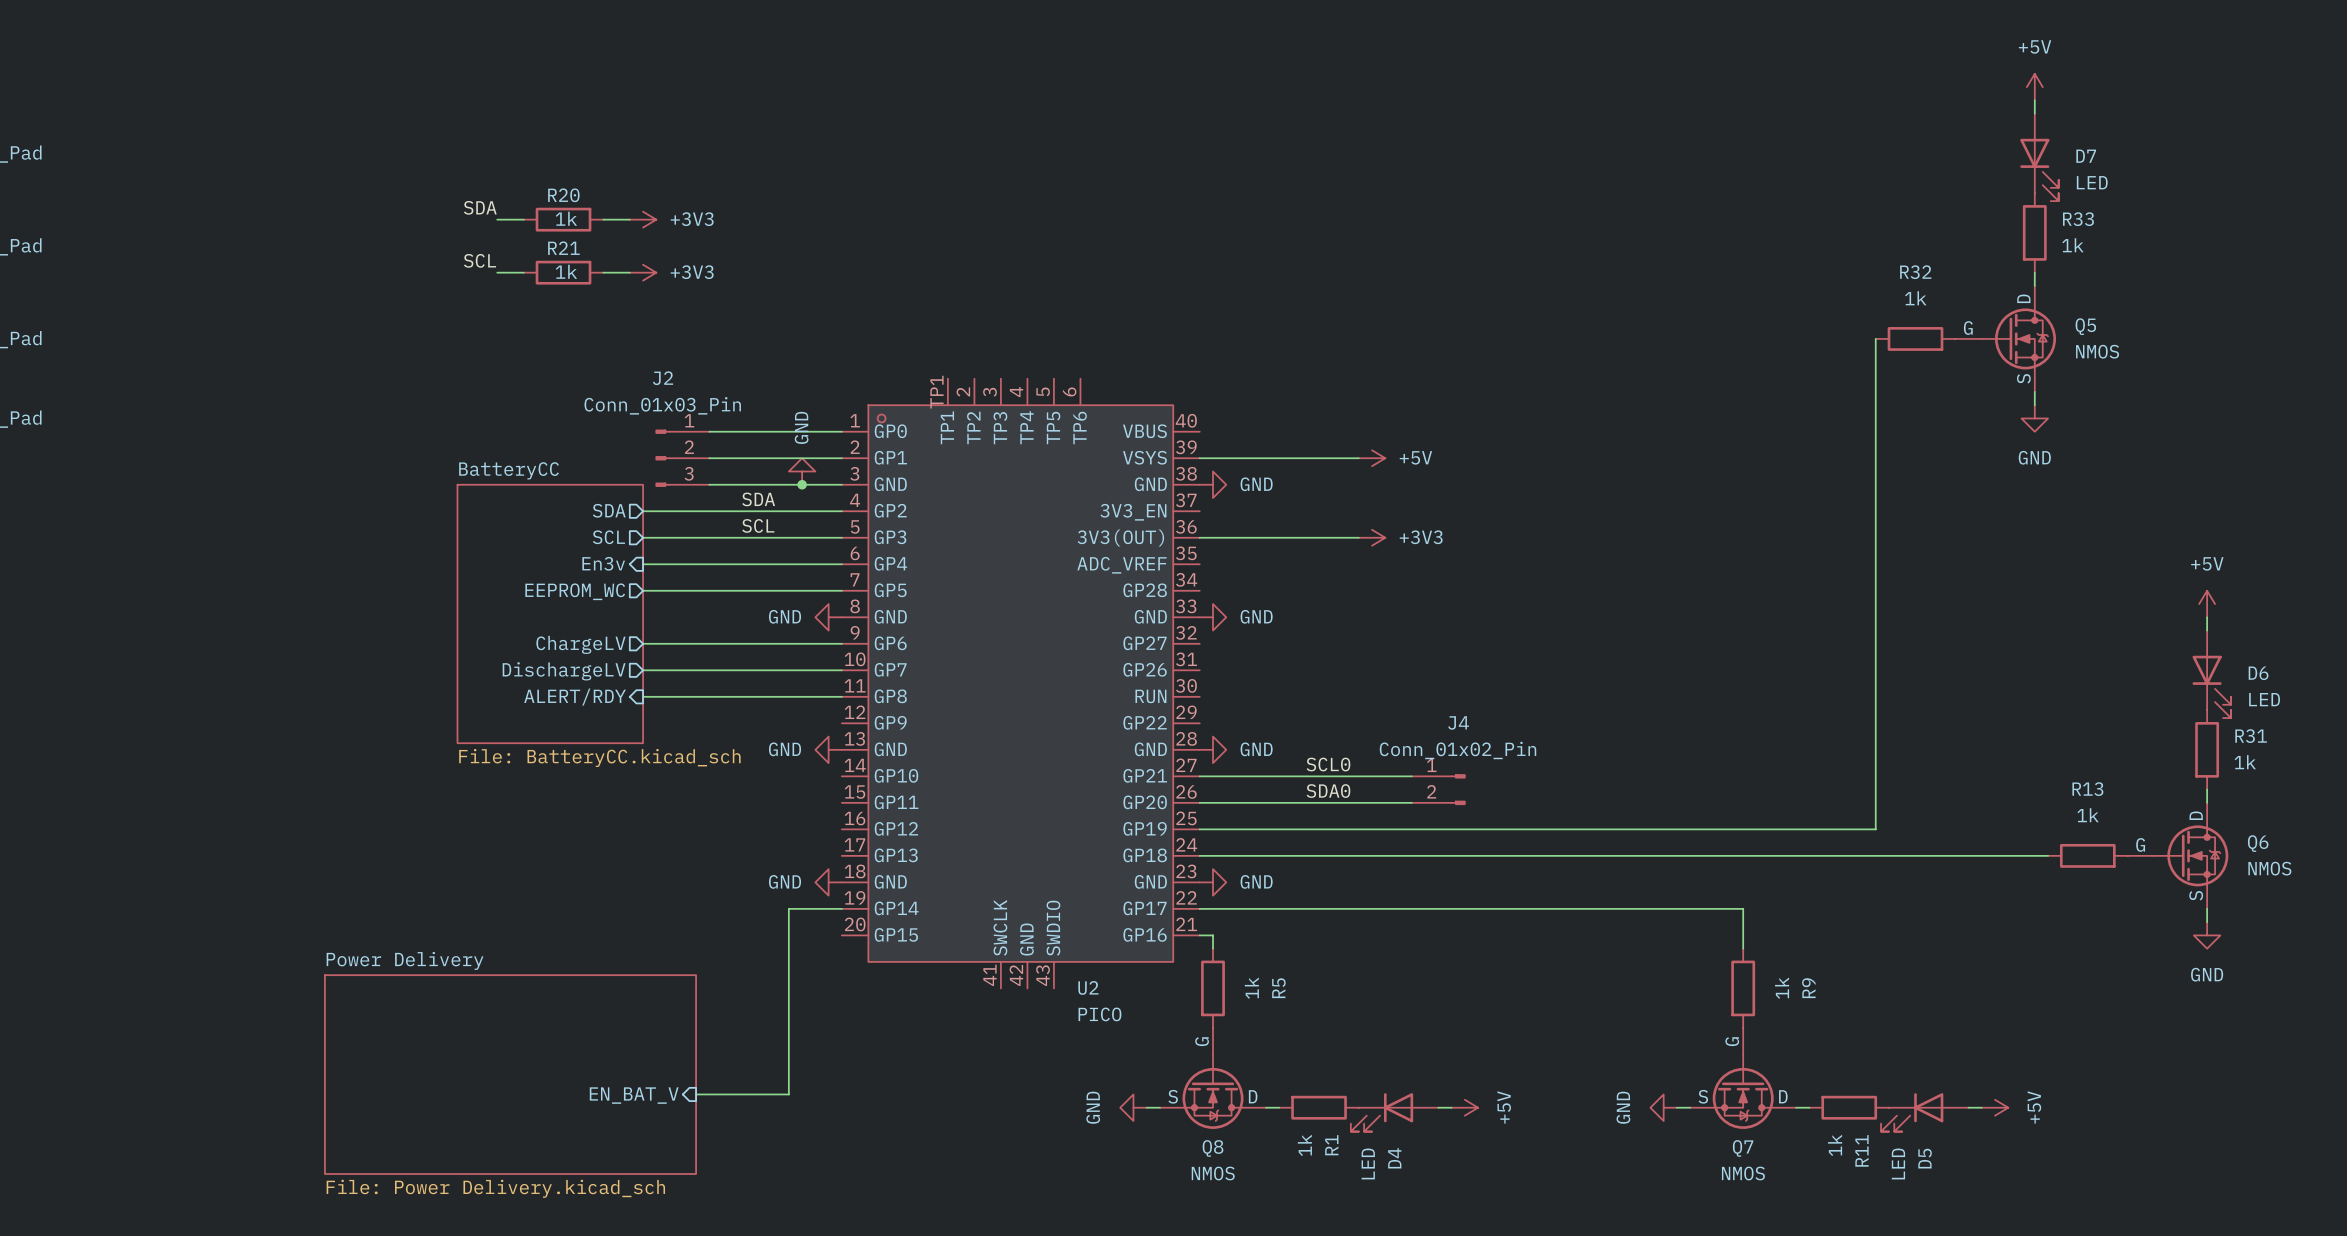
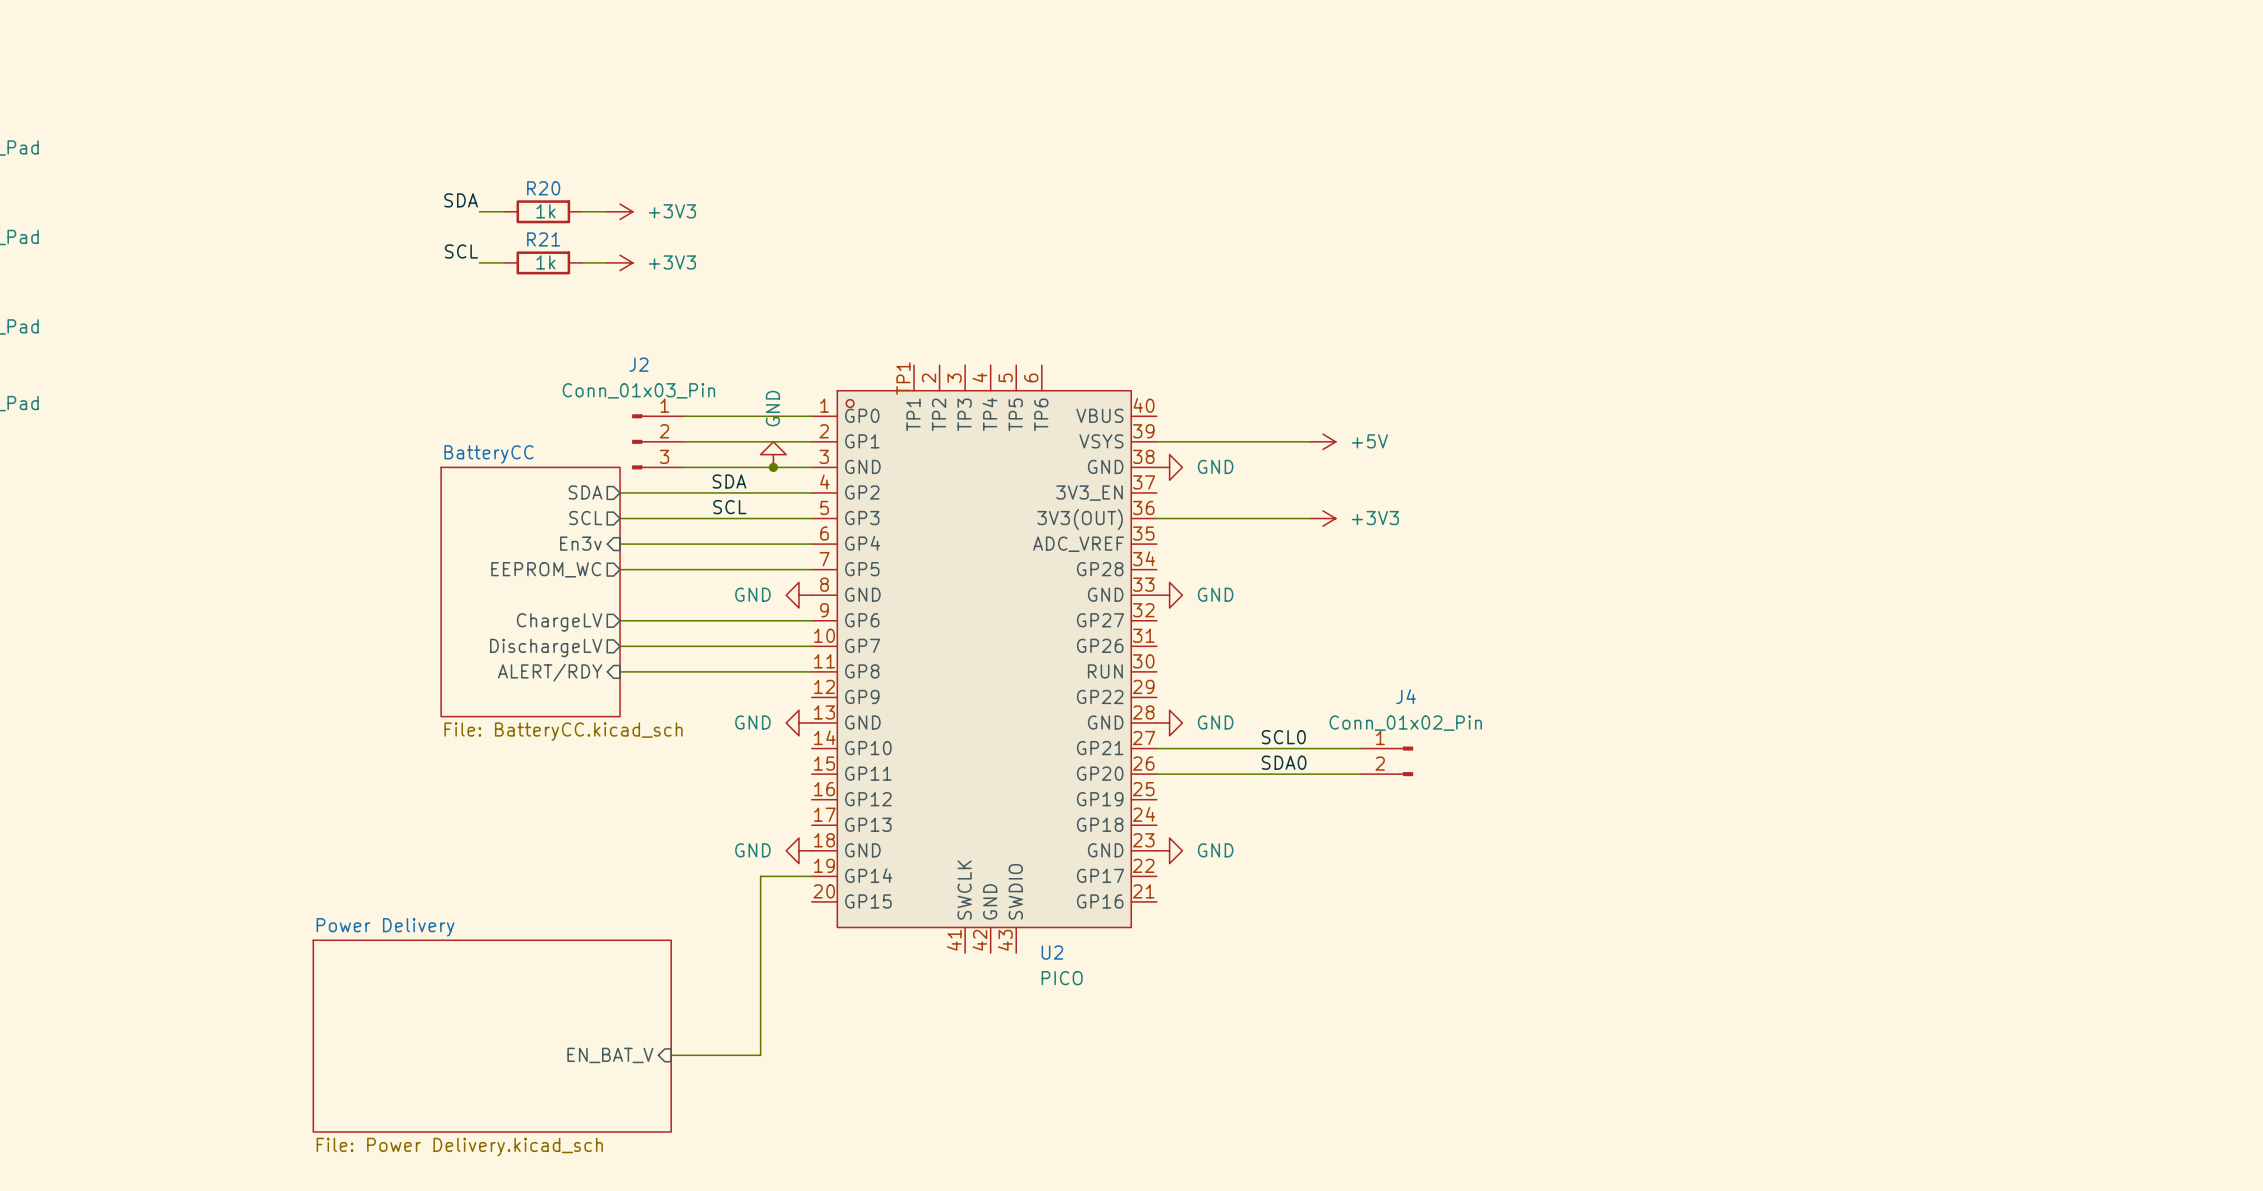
power symbol: +5V (2034, 87) -> none
wire: (2034, 100) (2034, 113) -> none
D7: LED (2039, 157) -> none
R33: 1k (2034, 232) -> none
wire: (2034, 272) (2034, 285) -> none
wire: (1875, 338) (1875, 829) (1199, 829) -> none
R32: 1k (1915, 338) -> none
Q5: NMOS (2005, 338) -> none
wire: (2034, 391) (2034, 405) -> none
power symbol: GND (2034, 418) -> none
power symbol: +5V (2207, 604) -> none
wire: (2207, 617) (2207, 630) -> none
D6: LED (2211, 674) -> none
R31: 1k (2207, 749) -> none
wire: (2207, 789) (2207, 802) -> none
wire: (1199, 855) (2048, 855) -> none
R13: 1k (2087, 855) -> none
Q6: NMOS (2177, 855) -> none
wire: (1199, 908) (1743, 908) (1743, 948) -> none
wire: (2207, 908) (2207, 922) -> none
wire: (1199, 935) (1213, 935) (1213, 948) -> none
power symbol: GND (2207, 935) -> none
R5: 1k (1213, 988) -> none
R9: 1k (1743, 988) -> none
Q8: NMOS (1213, 1078) -> none
Q7: NMOS (1743, 1078) -> none
power symbol: GND (1133, 1107) -> none
wire: (1146, 1107) (1159, 1107) -> none
wire: (1266, 1107) (1279, 1107) -> none
R1: 1k (1319, 1107) -> none
wire: (1438, 1107) (1451, 1107) -> none
power symbol: +5V (1464, 1107) -> none
power symbol: GND (1663, 1107) -> none
wire: (1676, 1107) (1690, 1107) -> none
wire: (1796, 1107) (1809, 1107) -> none
R11: 1k (1849, 1107) -> none
wire: (1968, 1107) (1981, 1107) -> none
power symbol: +5V (1995, 1107) -> none
D4: LED (1394, 1112) -> none
D5: LED (1924, 1112) -> none

